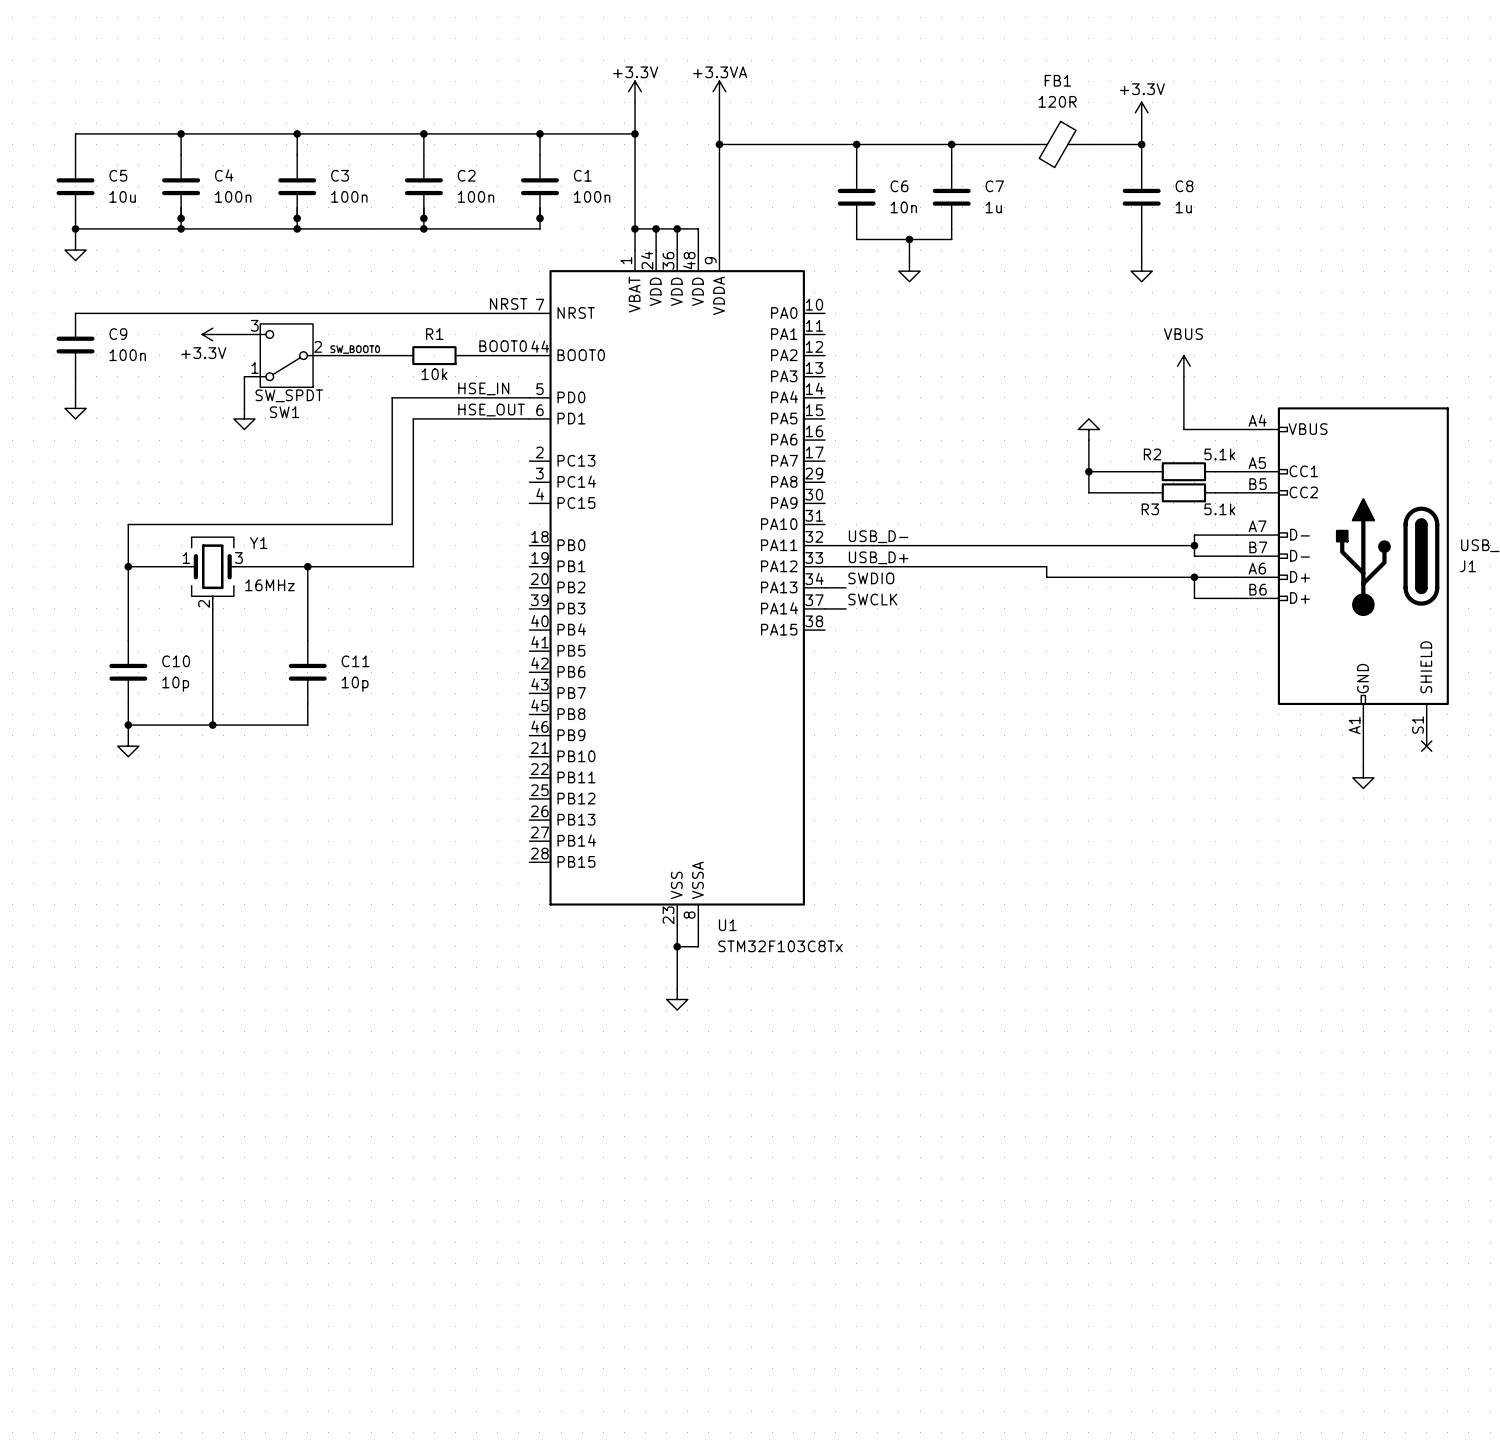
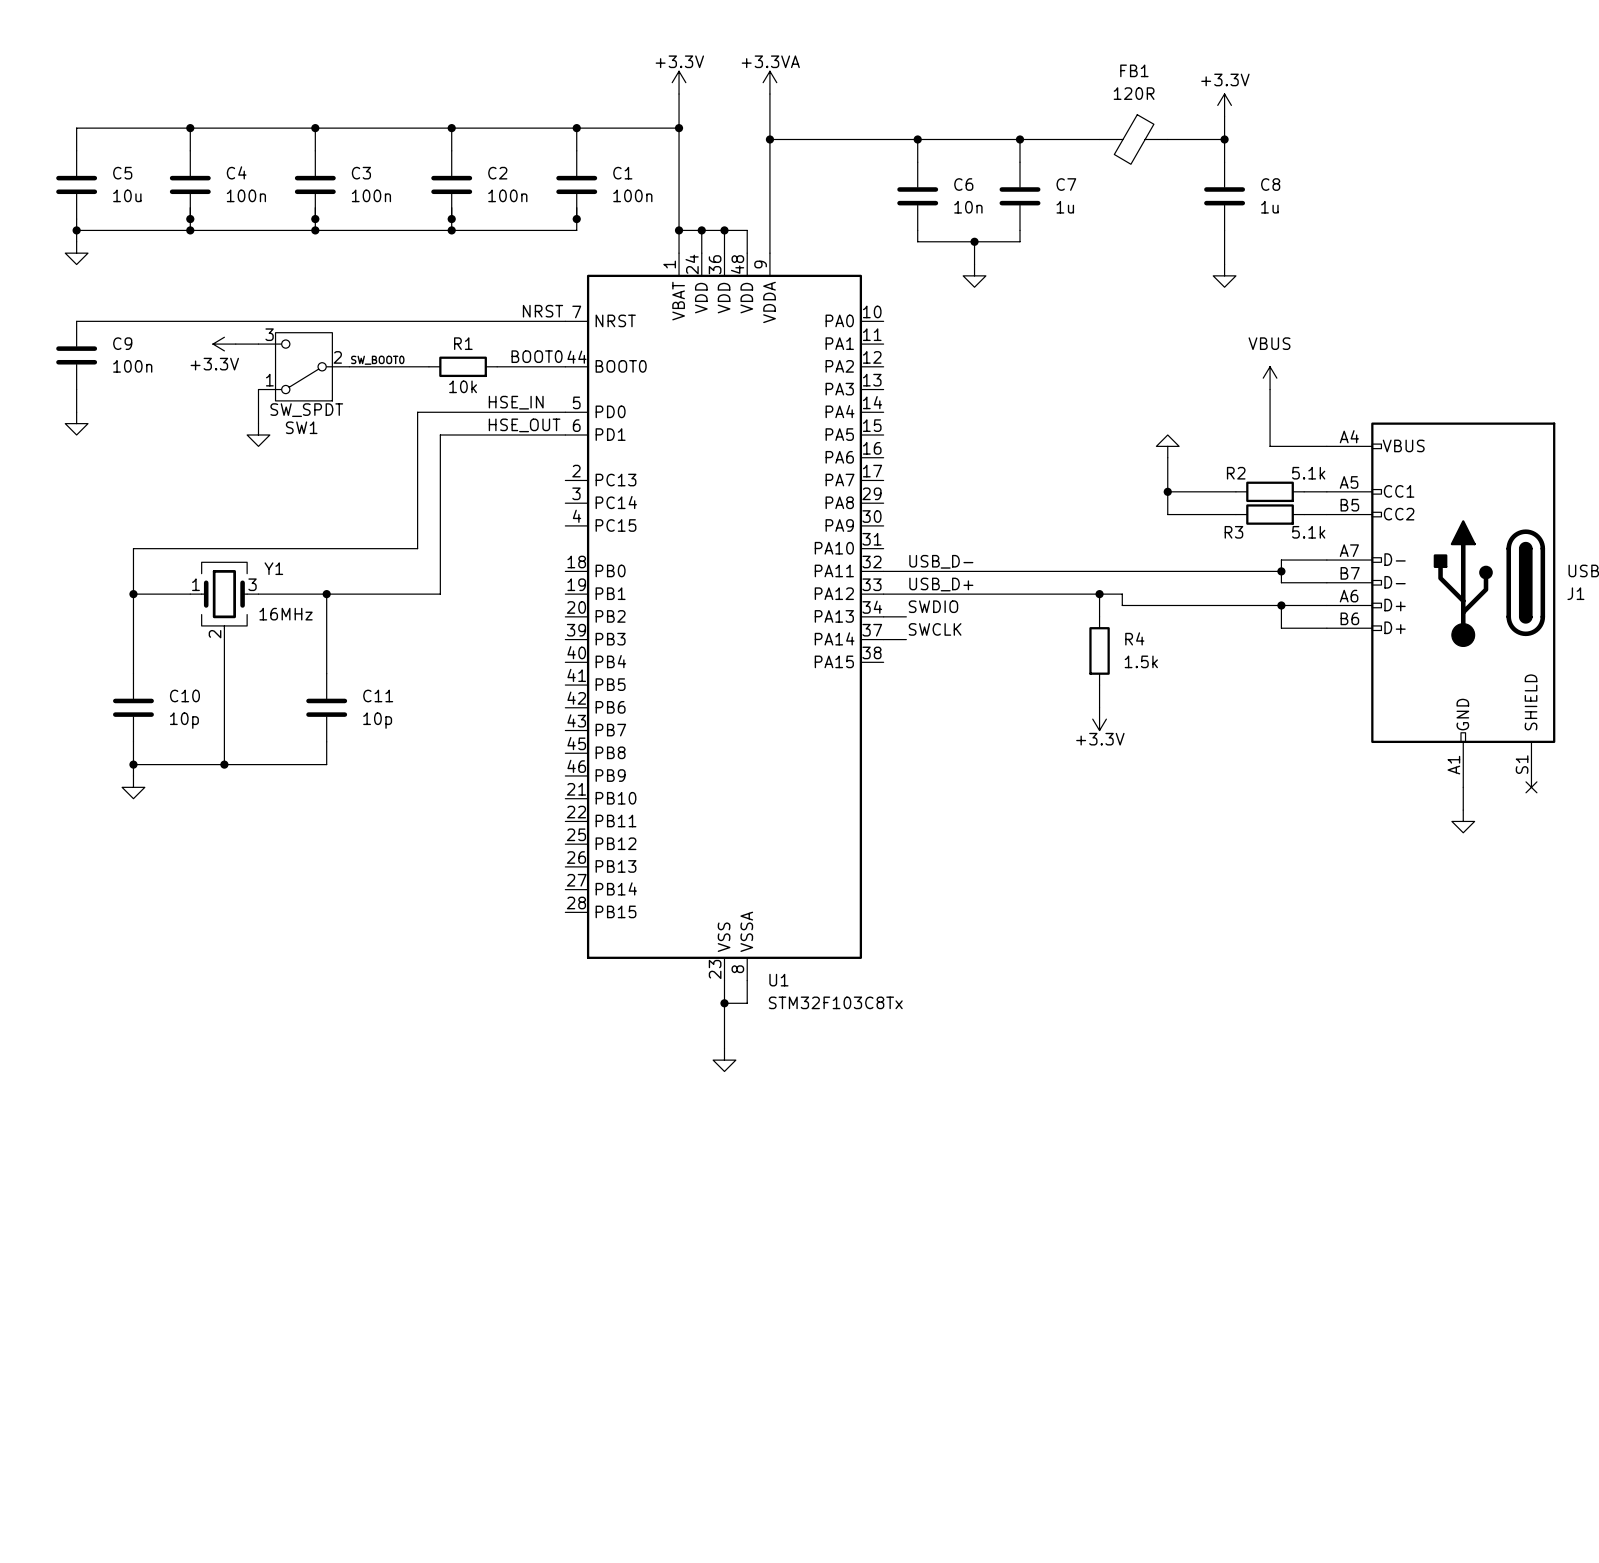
wire: none -> (1099, 594) (1099, 616)
junction: none -> (1099, 594)
R4: none -> 1.5k (1099, 650)
wire: none -> (1099, 685) (1099, 707)
power symbol: none -> +3.3V (1099, 719)

